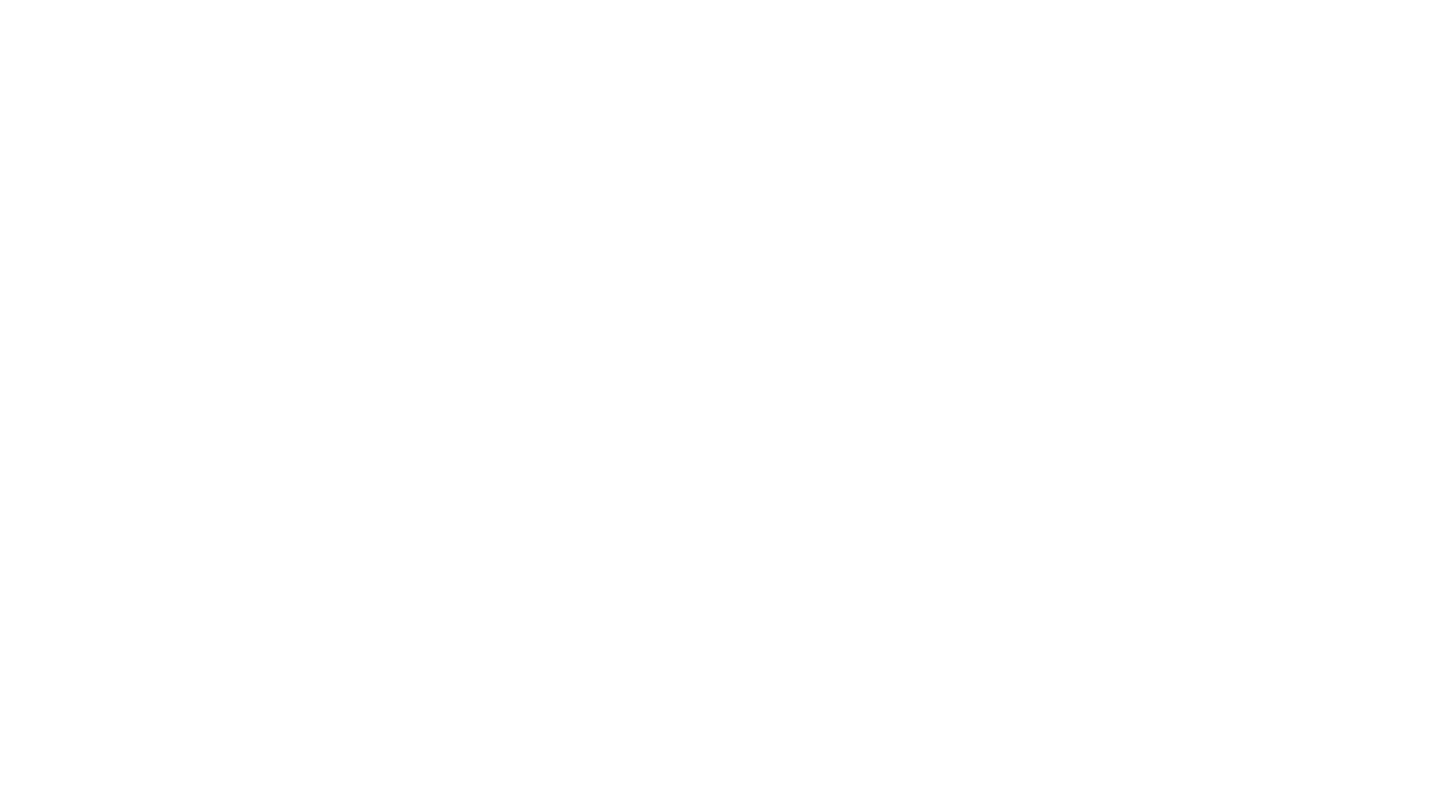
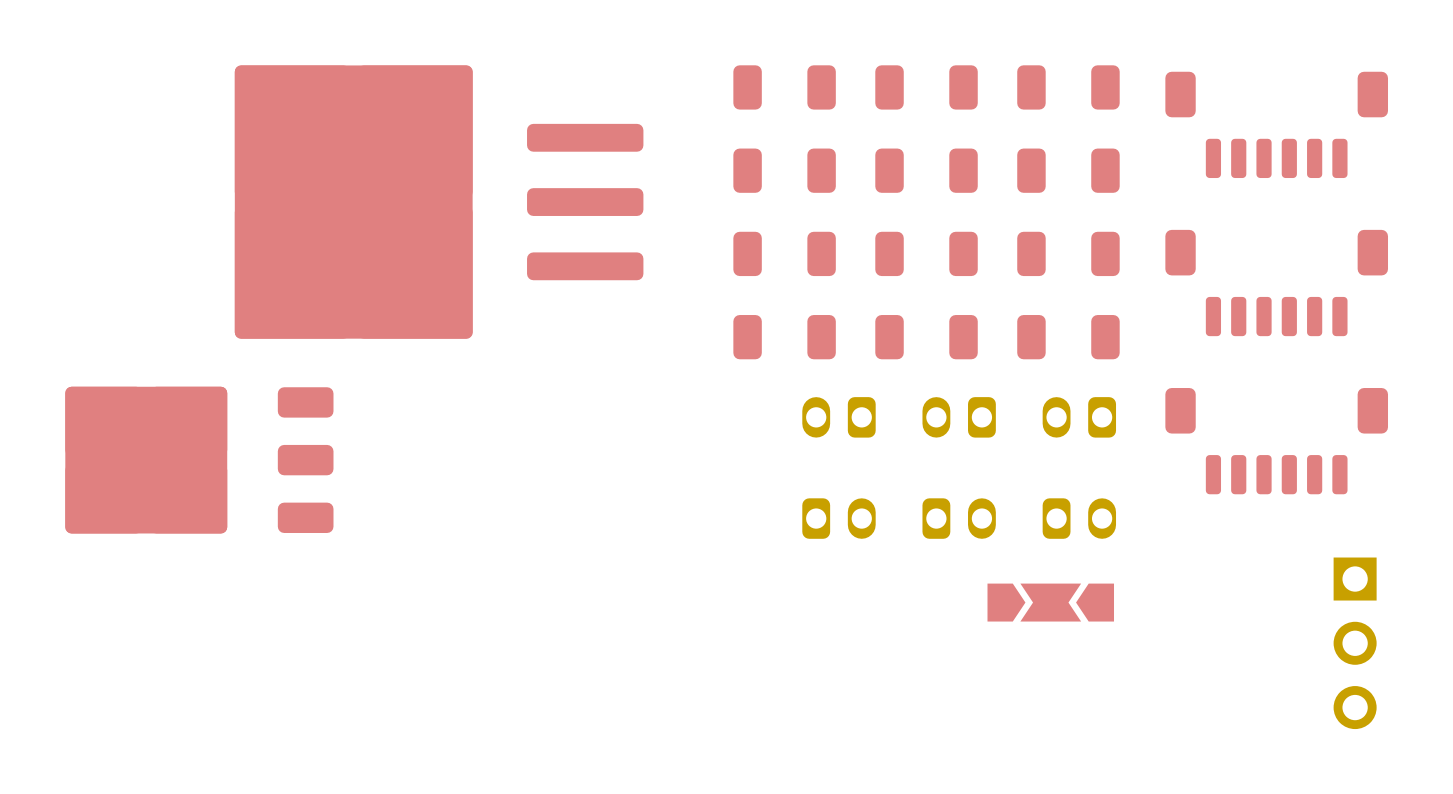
part: none -> (784, 87)
part: none -> (926, 87)
part: none -> (1068, 87)
part: none -> (1276, 124)
part: none -> (784, 170)
part: none -> (926, 170)
part: none -> (1068, 170)
part: none -> (439, 202)
part: none -> (784, 253)
part: none -> (926, 253)
part: none -> (1068, 253)
part: none -> (1276, 283)
part: none -> (784, 337)
part: none -> (926, 337)
part: none -> (1068, 337)
part: none -> (1276, 441)
part: none -> (199, 460)
part: none -> (838, 467)
part: none -> (959, 467)
part: none -> (1079, 467)
part: none -> (1050, 602)
part: none -> (1355, 643)

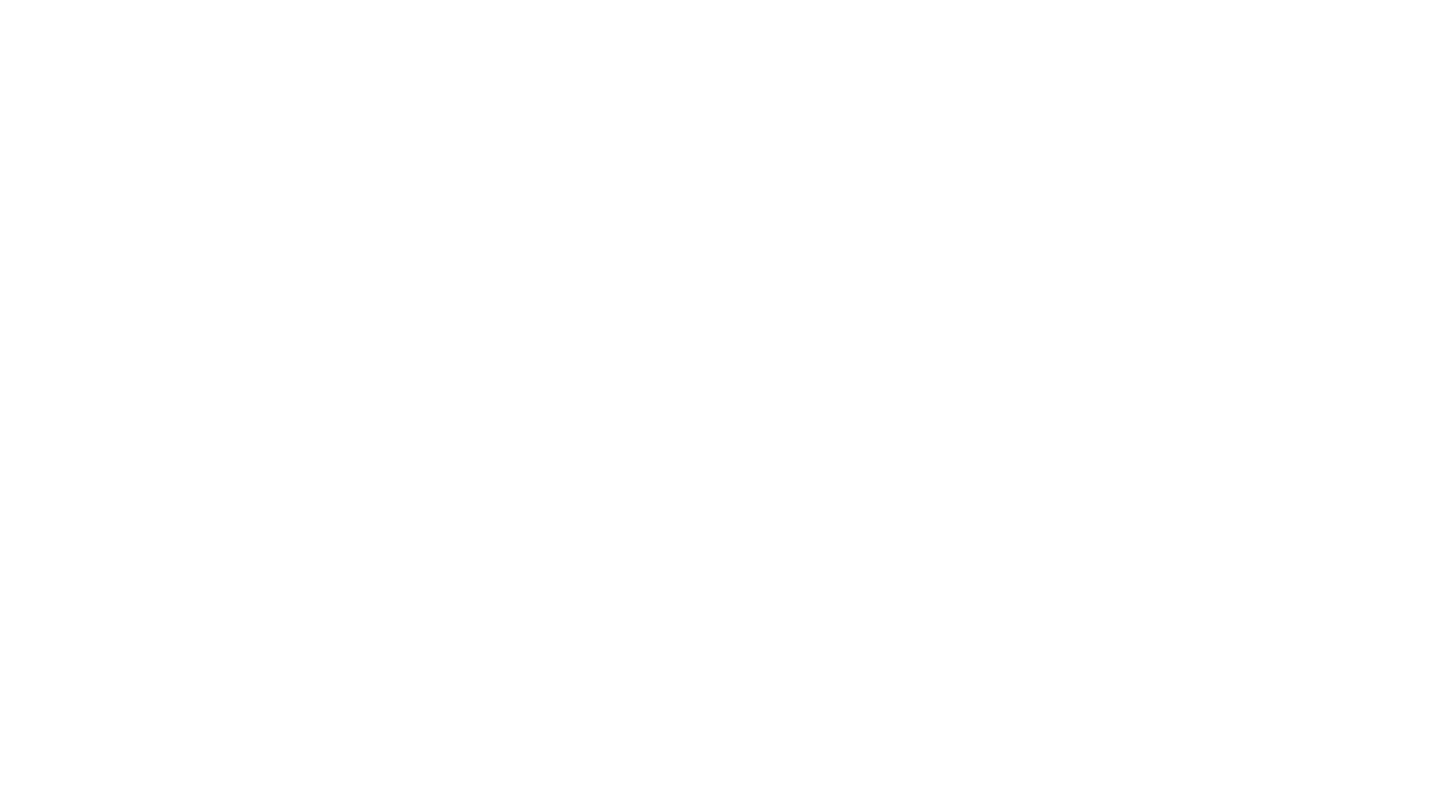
part: (784, 87) -> none
part: (926, 87) -> none
part: (1068, 87) -> none
part: (1276, 124) -> none
part: (784, 170) -> none
part: (926, 170) -> none
part: (1068, 170) -> none
part: (439, 202) -> none
part: (784, 253) -> none
part: (926, 253) -> none
part: (1068, 253) -> none
part: (1276, 283) -> none
part: (784, 337) -> none
part: (926, 337) -> none
part: (1068, 337) -> none
part: (1276, 441) -> none
part: (199, 460) -> none
part: (838, 467) -> none
part: (959, 467) -> none
part: (1079, 467) -> none
part: (1050, 602) -> none
part: (1355, 643) -> none

